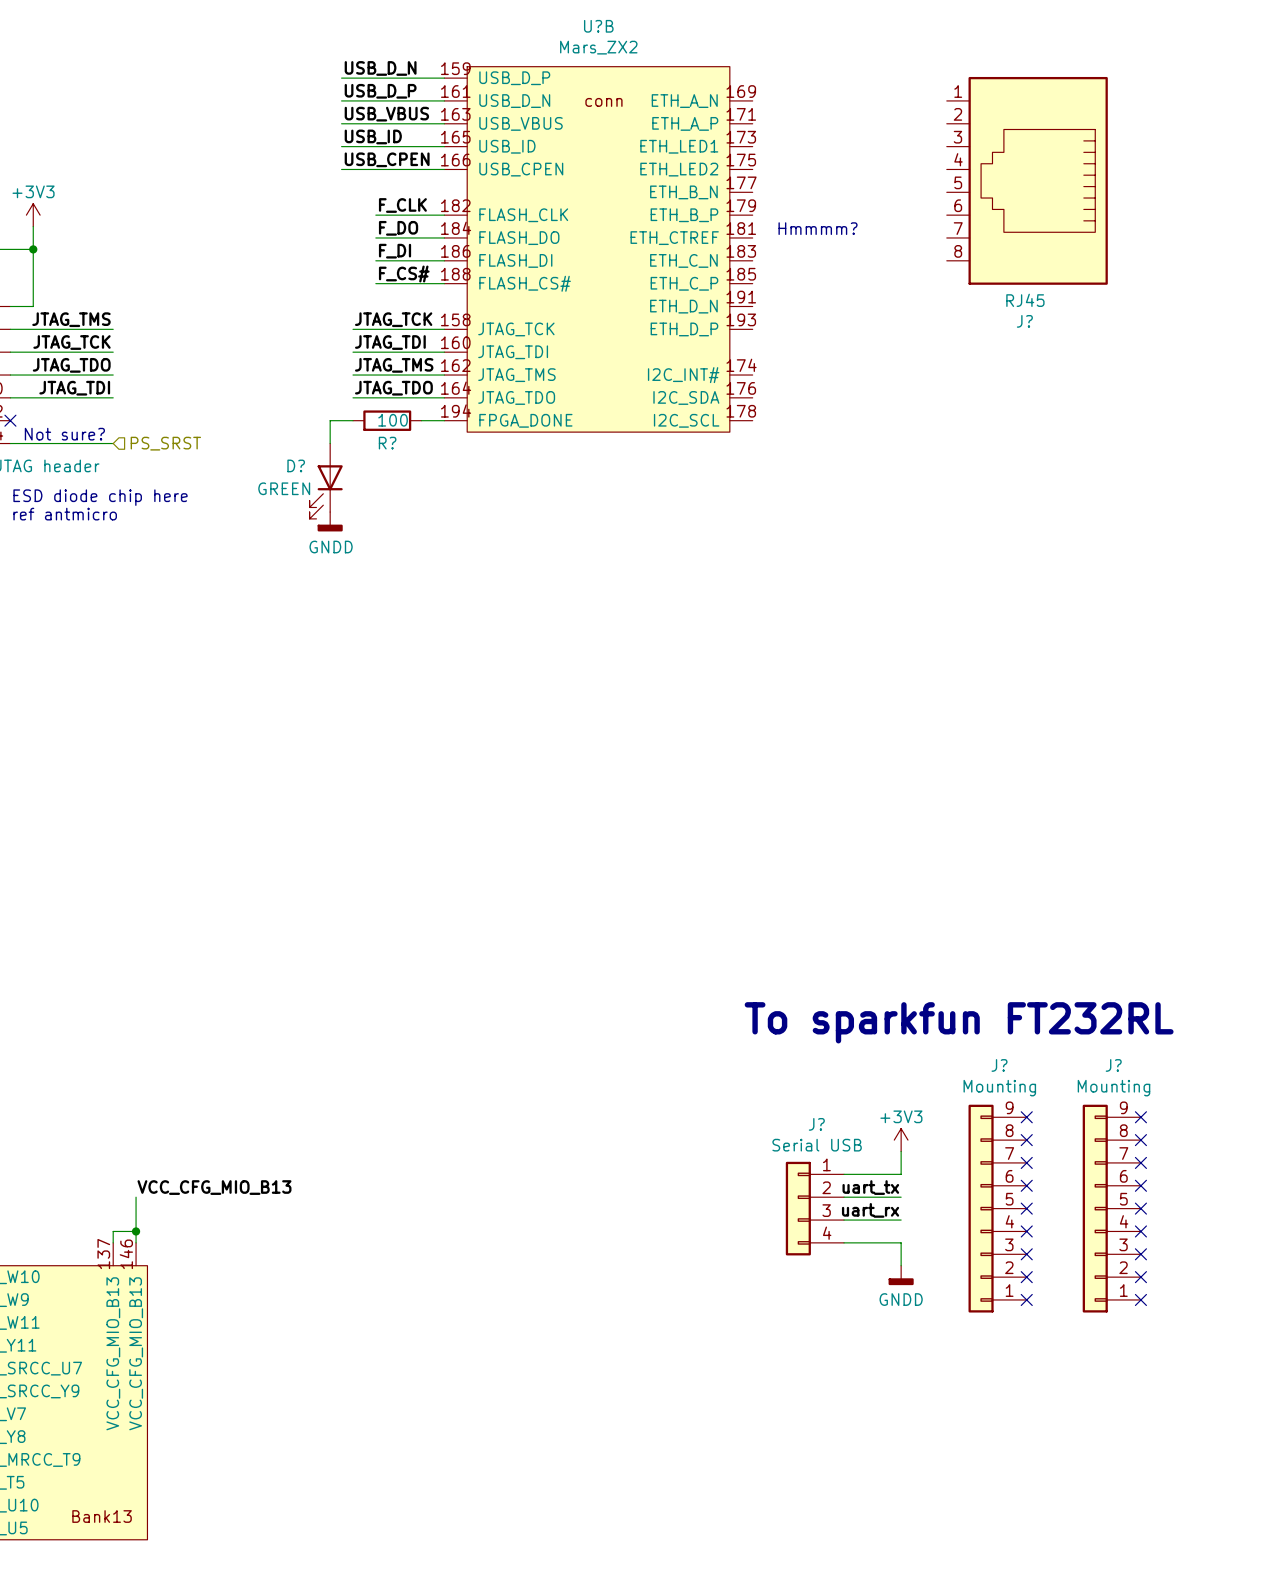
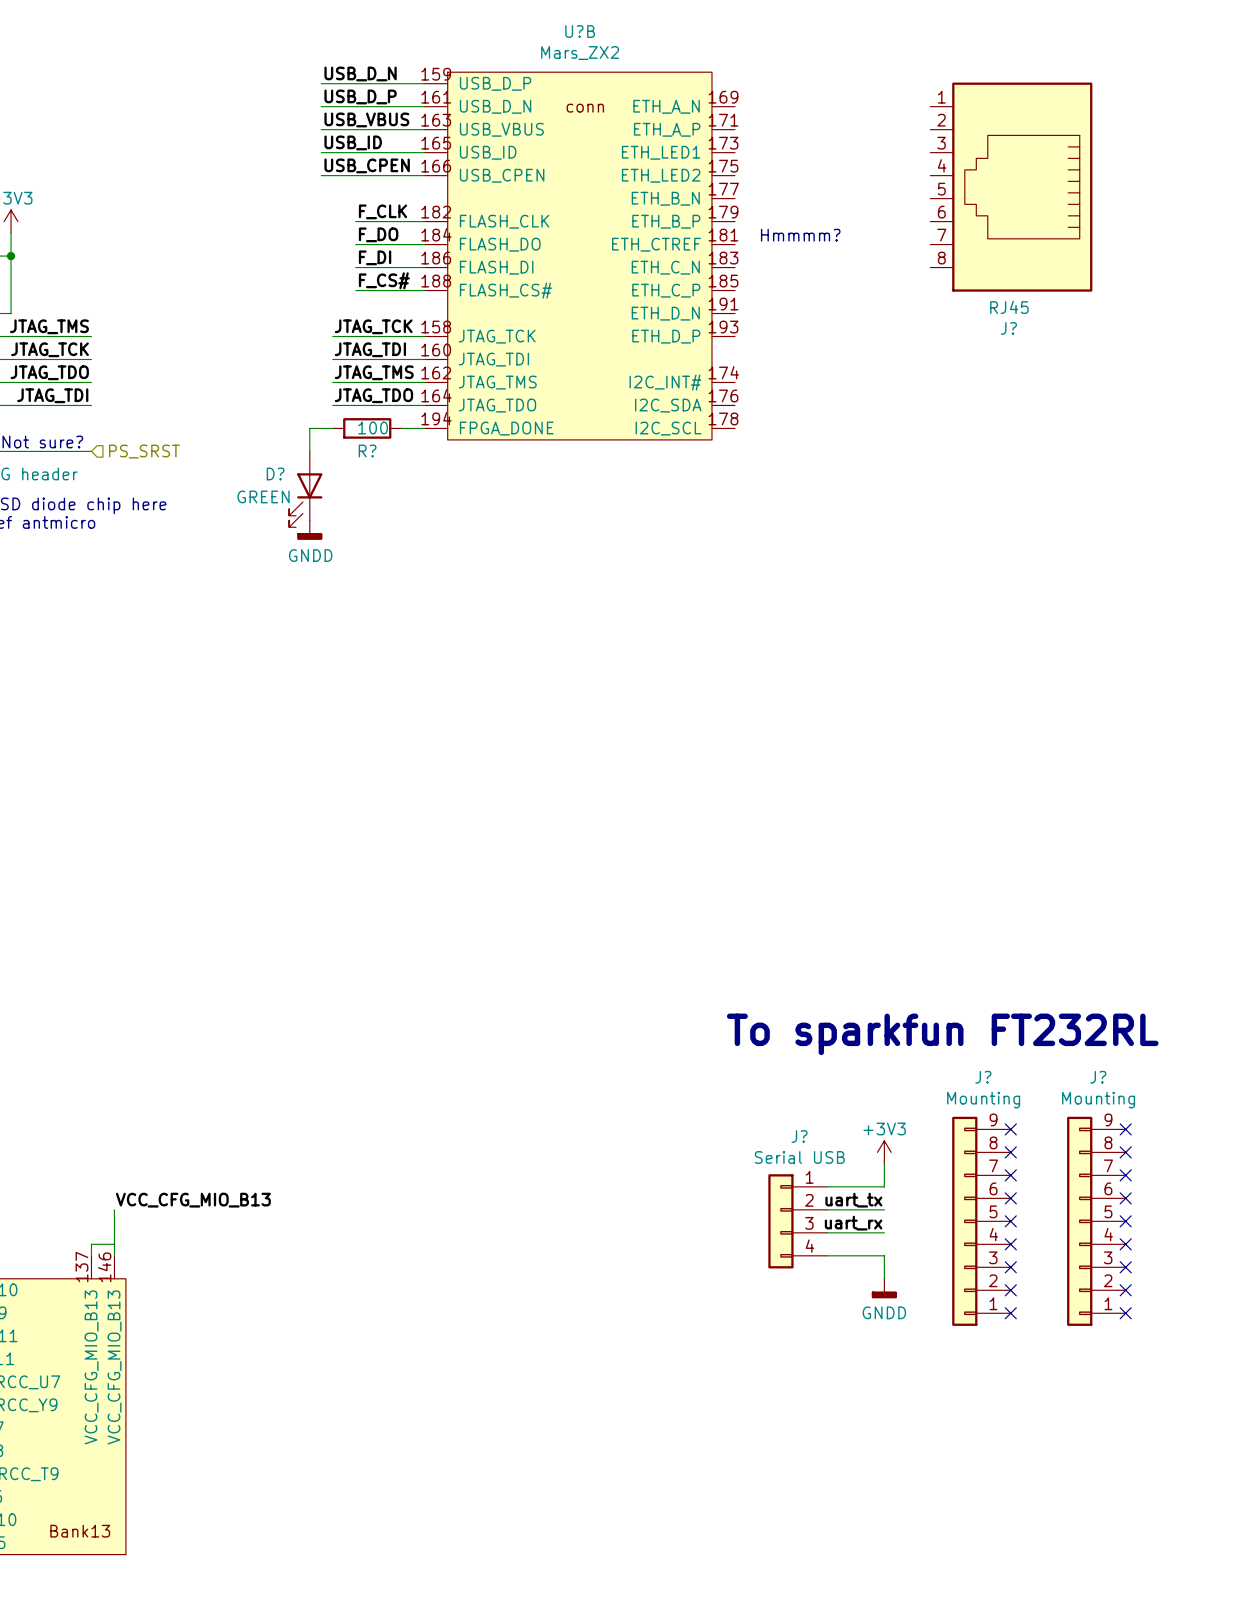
junction: (136, 1231) -> none

